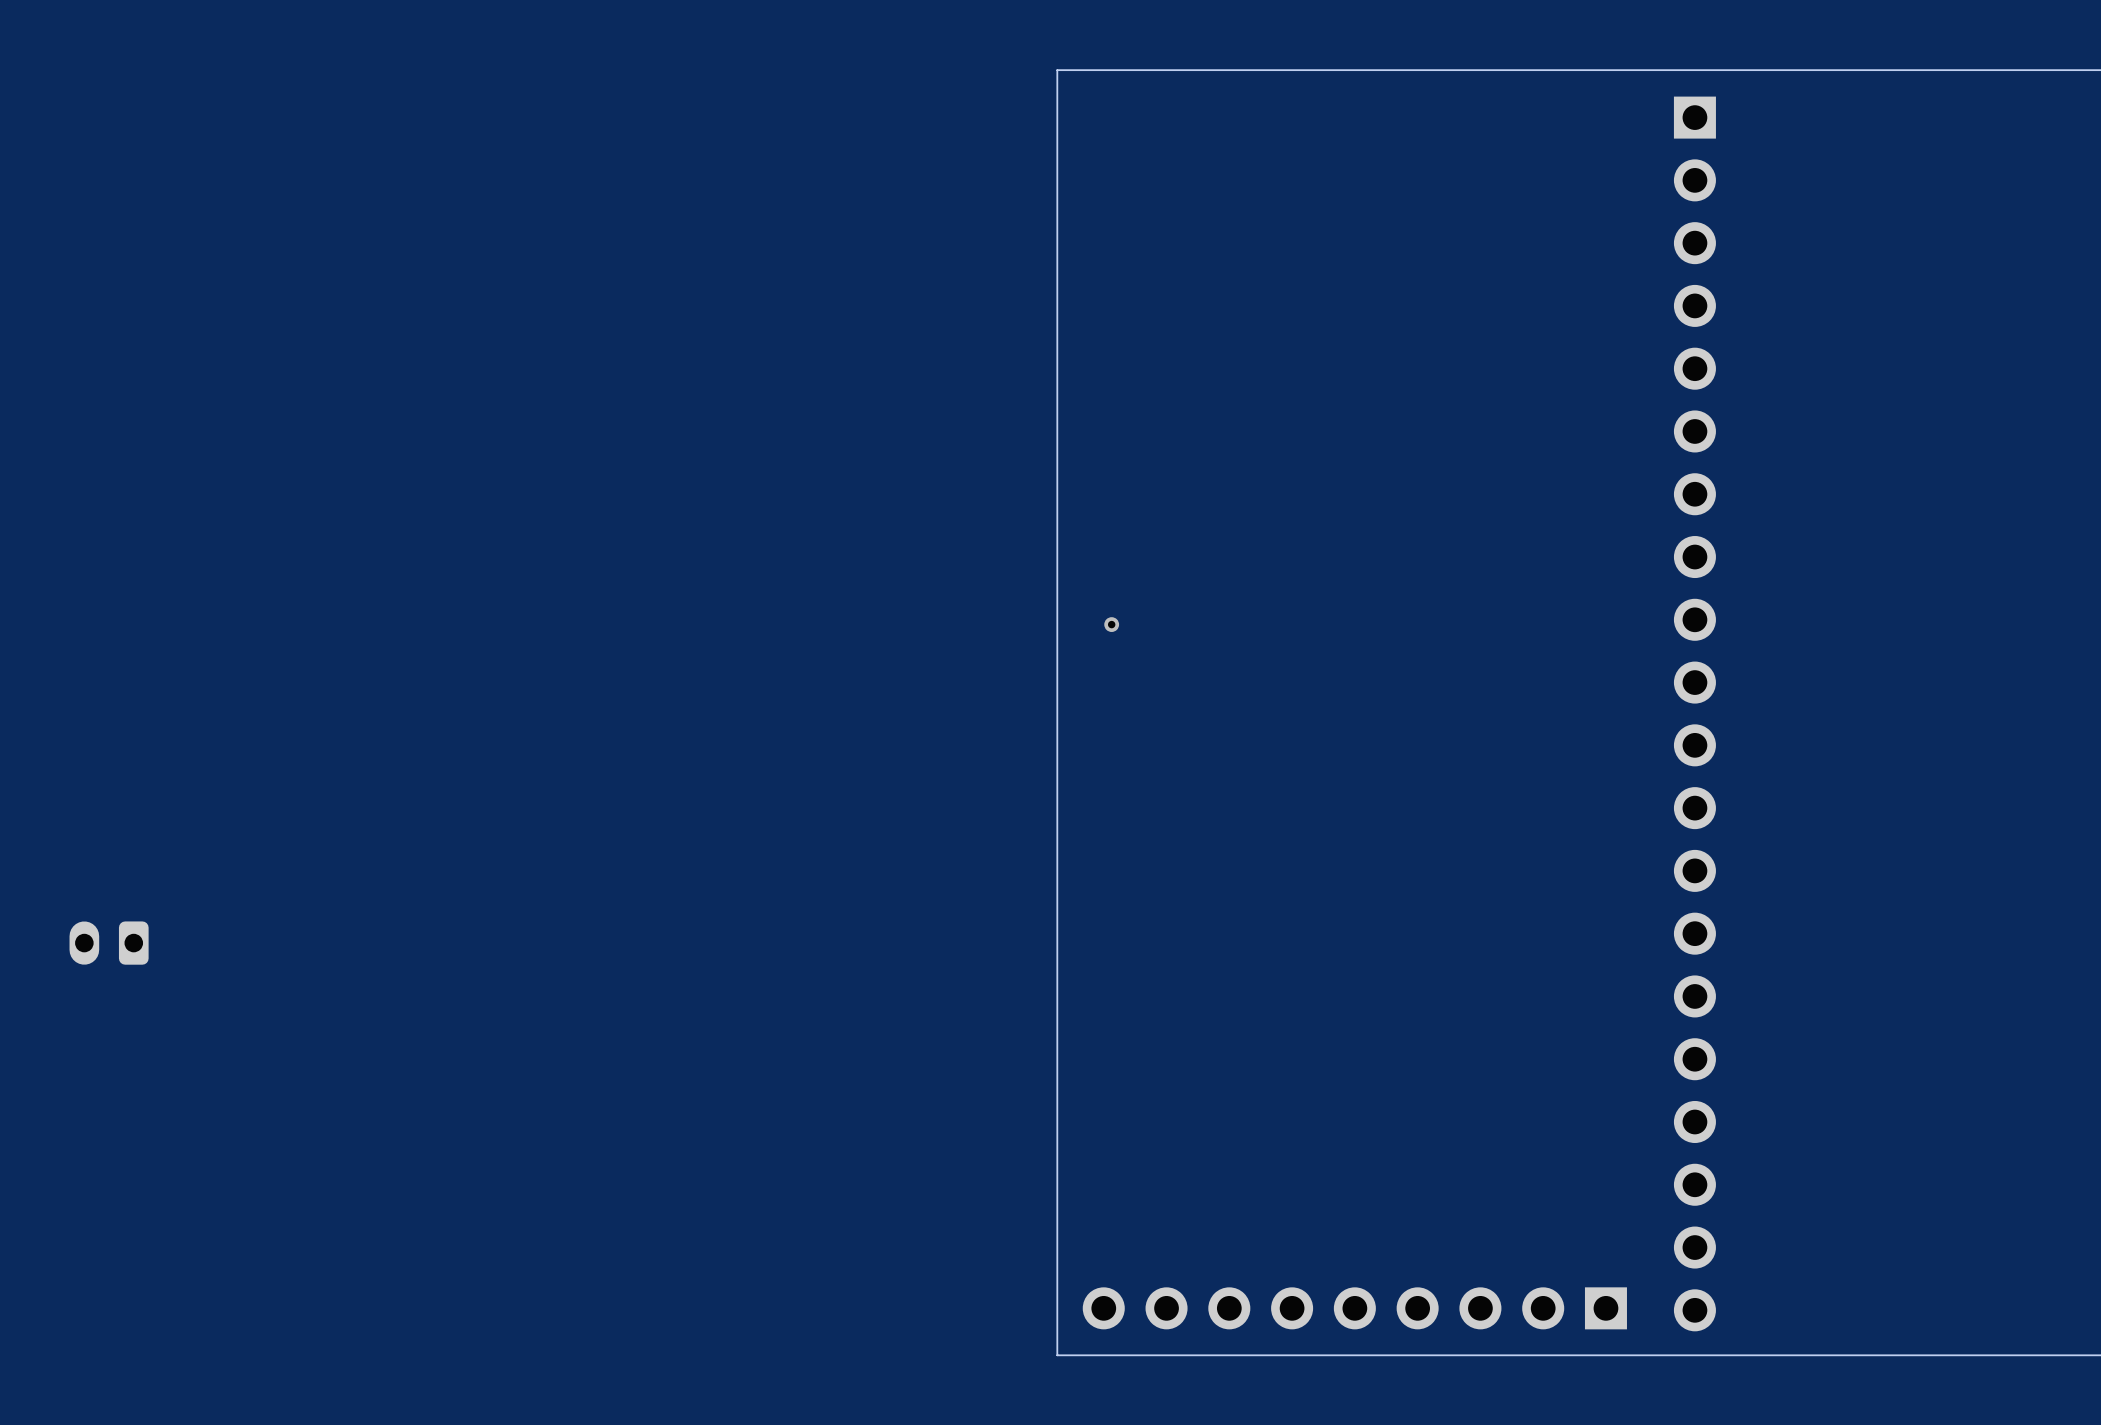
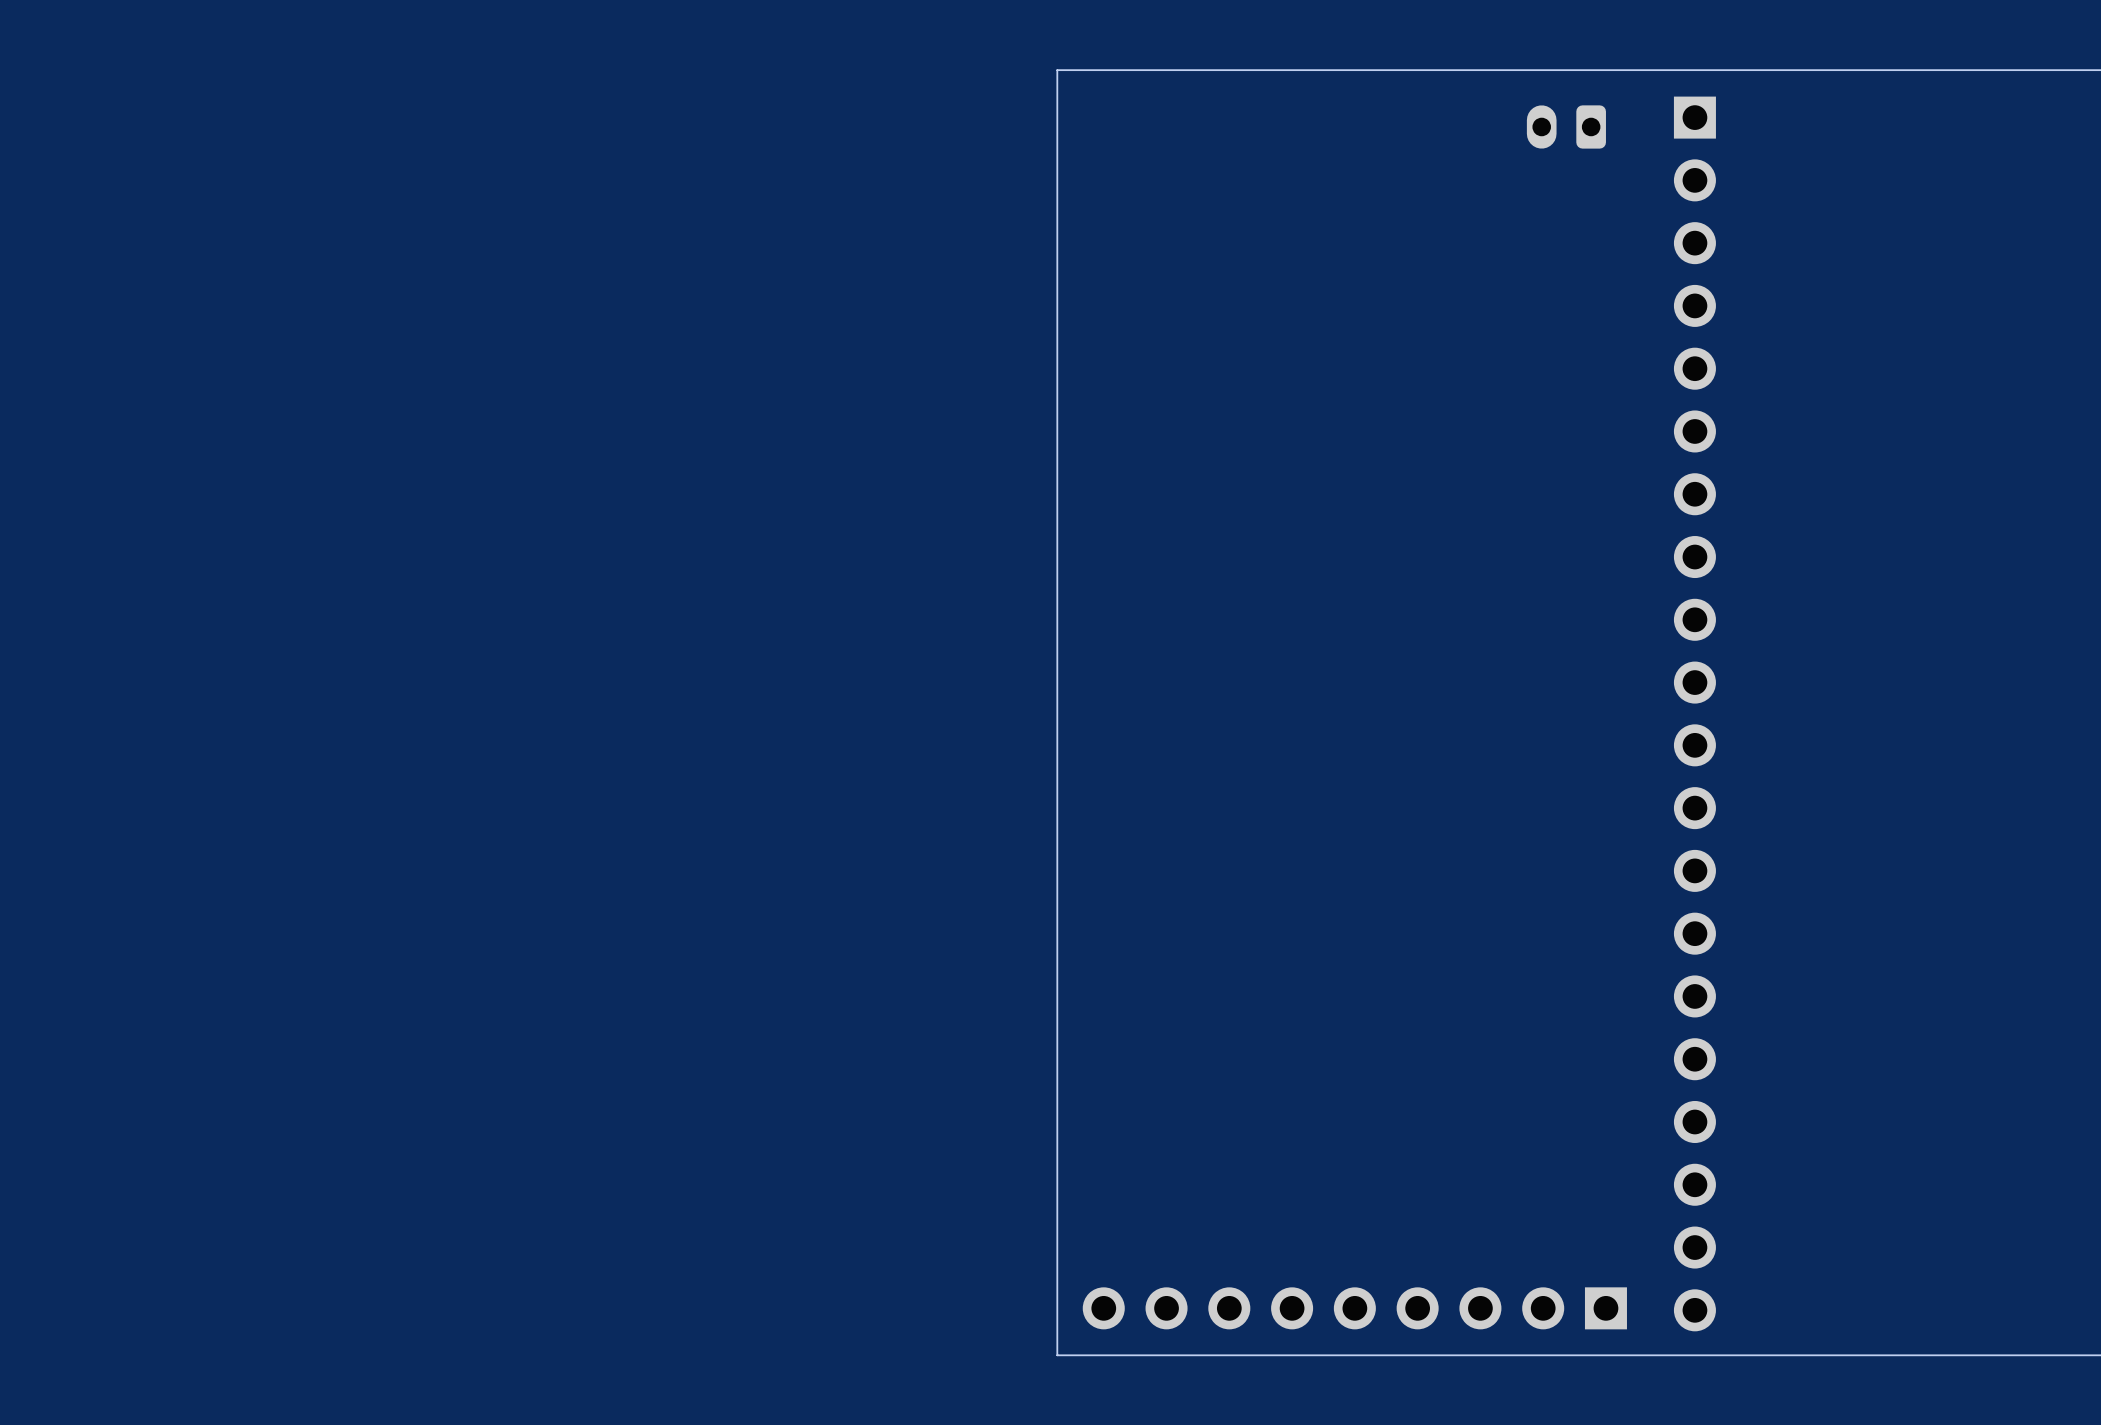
part: none -> (1566, 126)
via: (1111, 624) -> none
part: (109, 943) -> none

